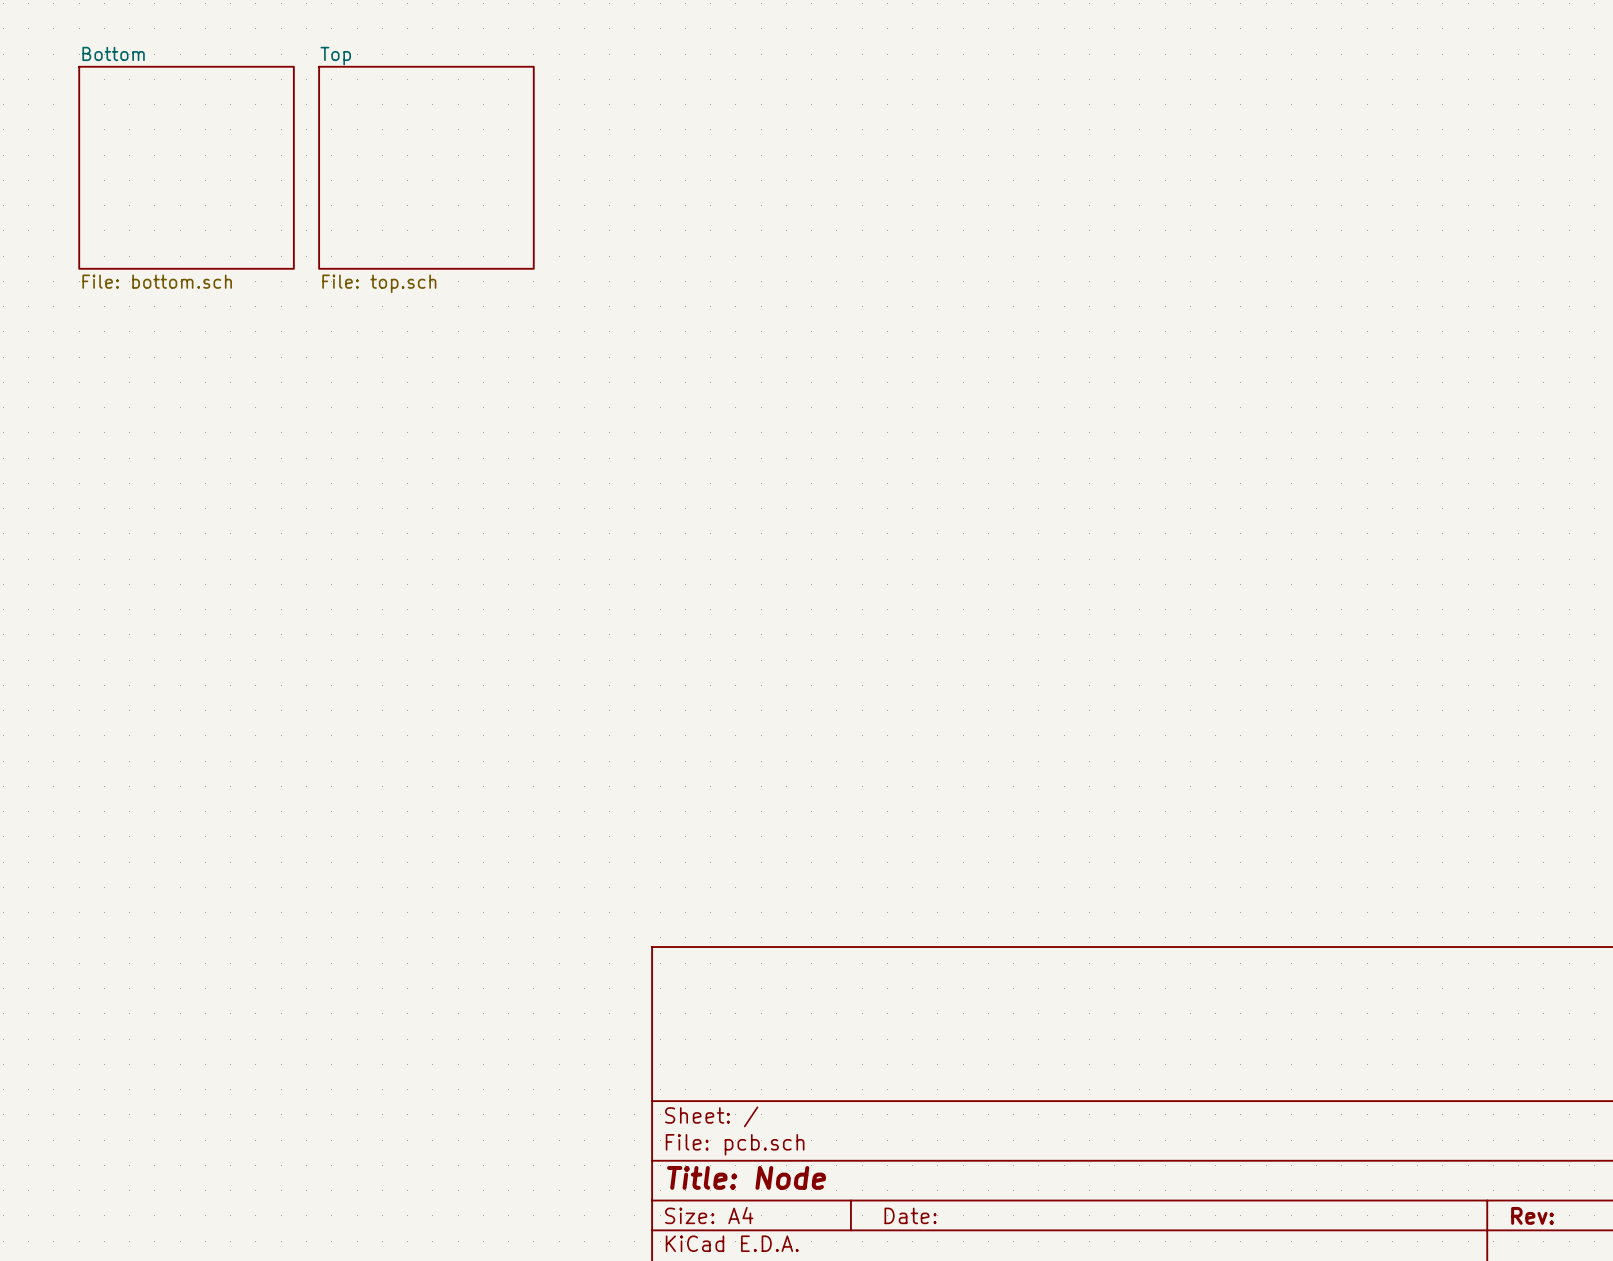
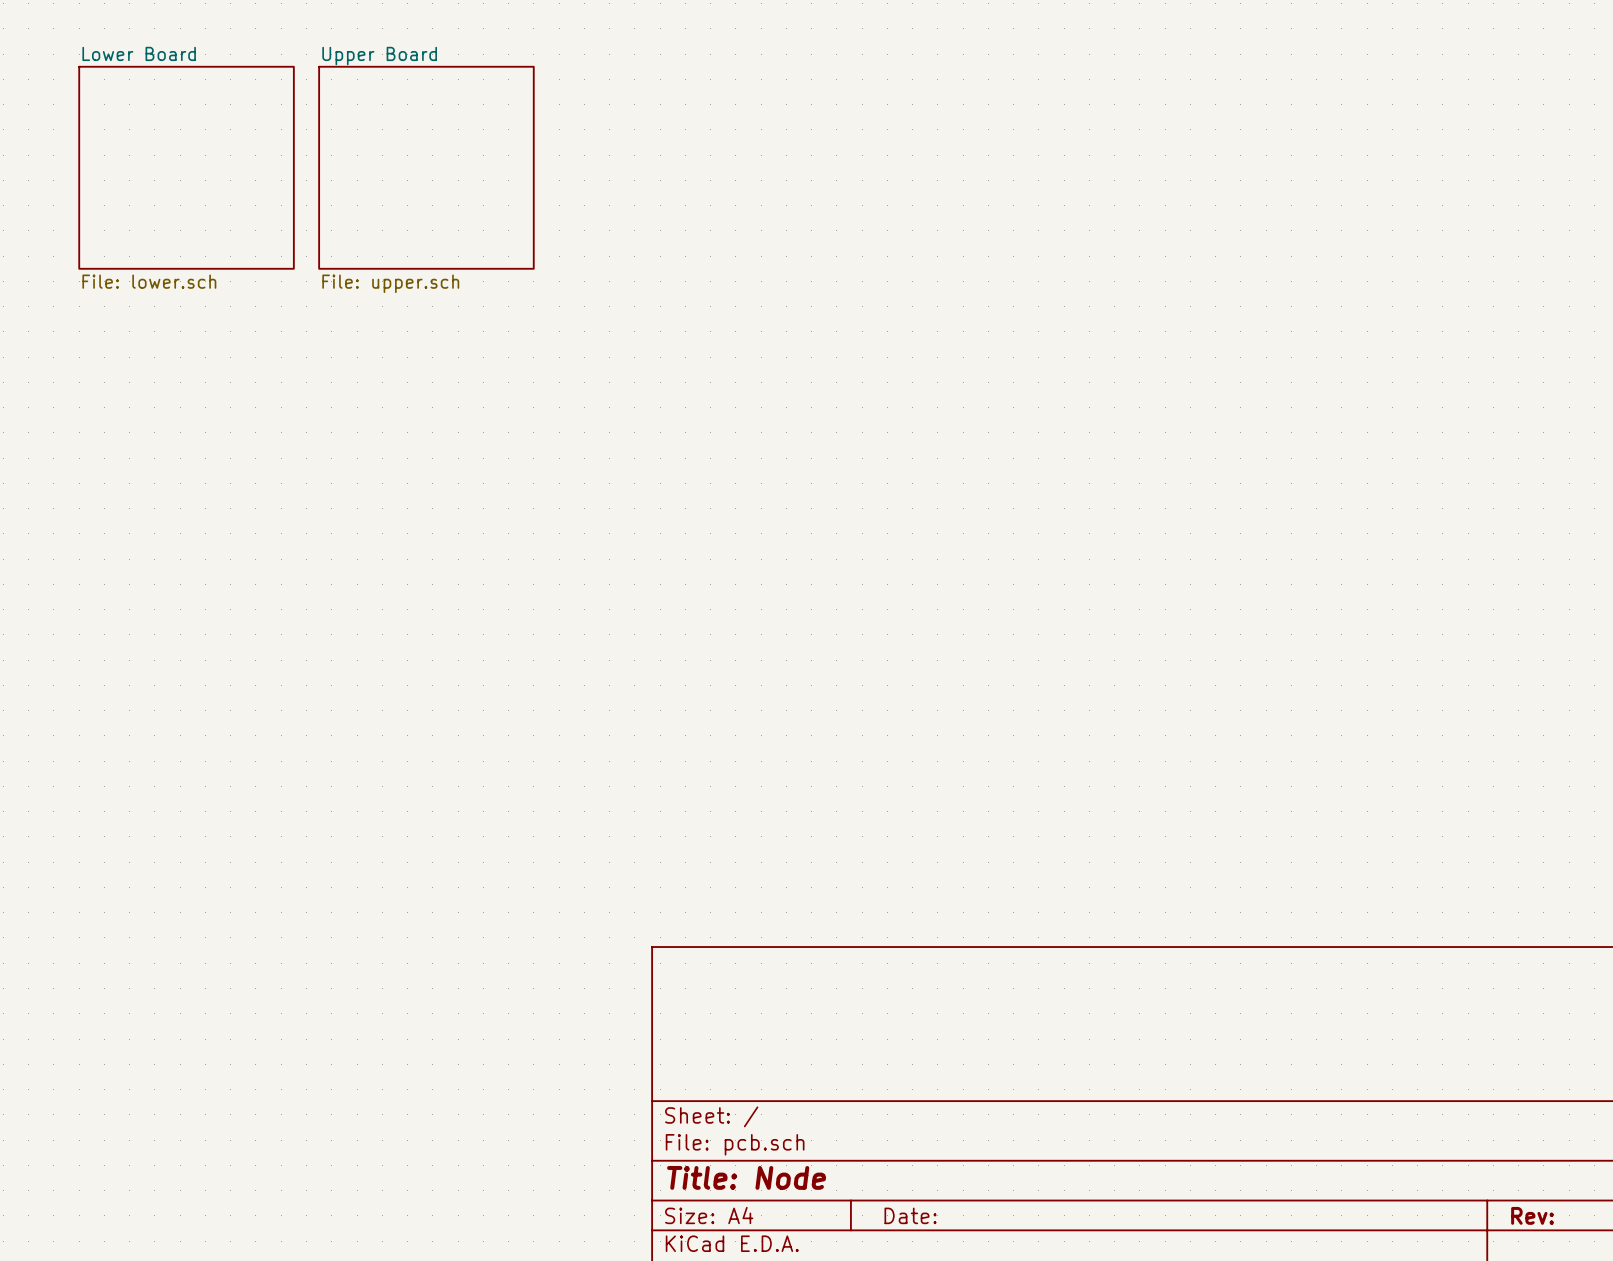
sheet Bottom name: Bottom (113, 53) -> Lower Board (139, 53)
sheet Top name: Top (335, 56) -> Upper Board (379, 56)
sheet Bottom value: File: bottom.sch (157, 281) -> File: lower.sch (149, 281)
sheet Top value: File: top.sch (379, 283) -> File: upper.sch (390, 283)

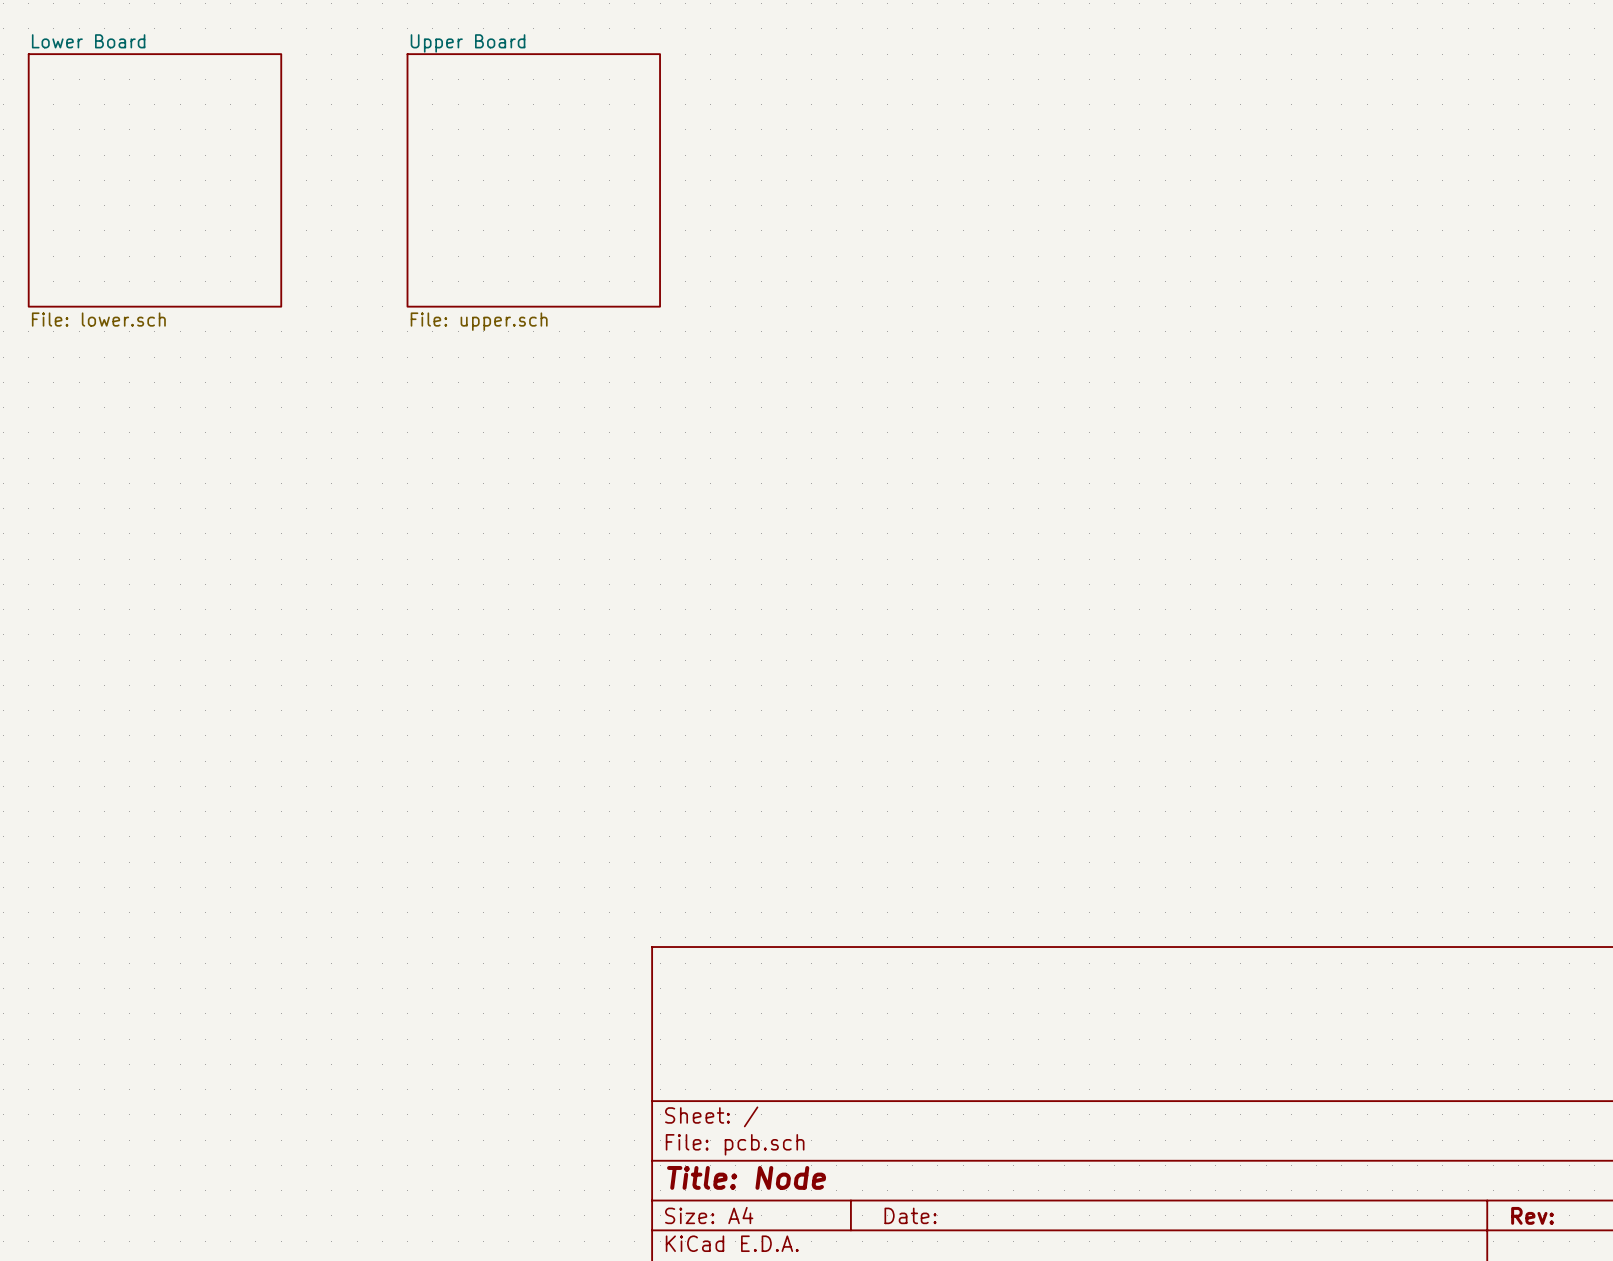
sheet Lower Board: File: lower.sch (186, 167) -> none
sheet Upper Board: File: upper.sch (426, 167) -> none
sheet Lower Board: none -> File: lower.sch (154, 180)
sheet Upper Board: none -> File: upper.sch (533, 180)

